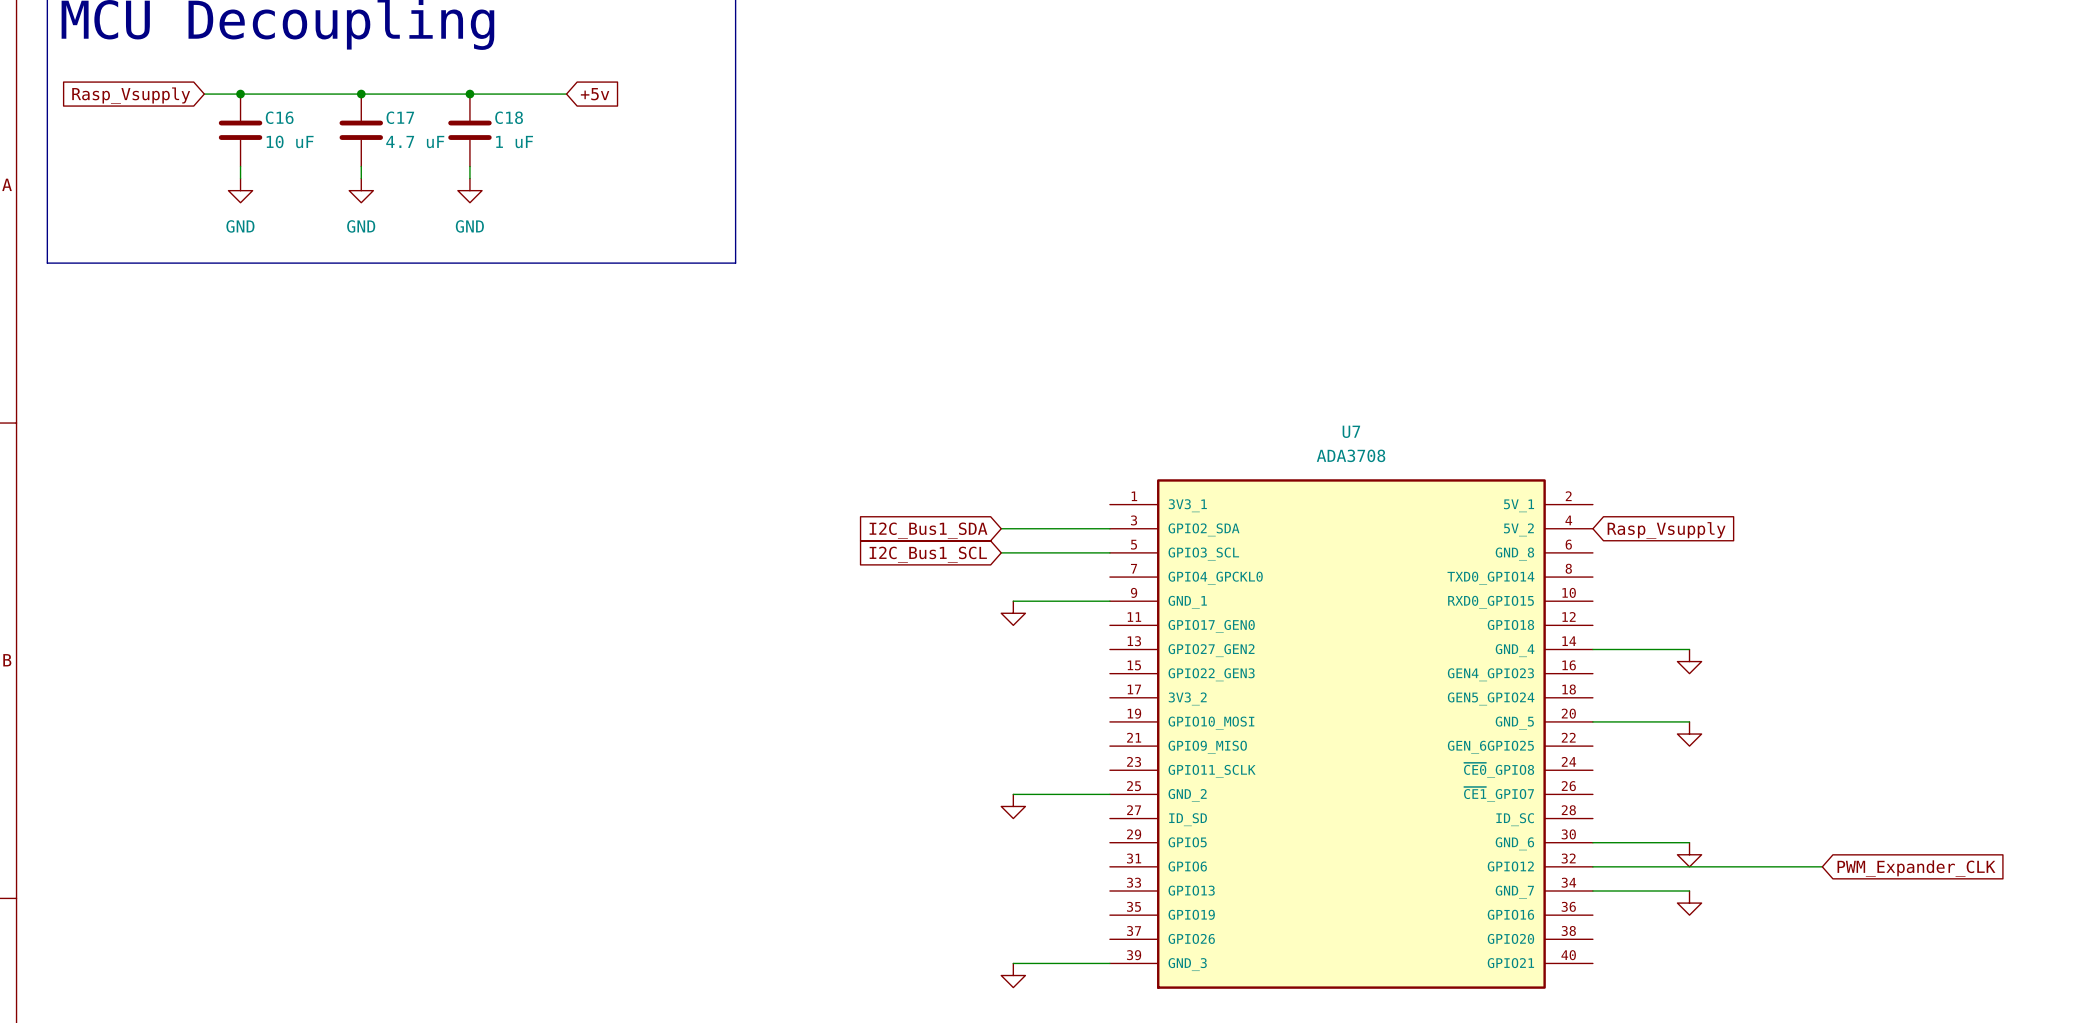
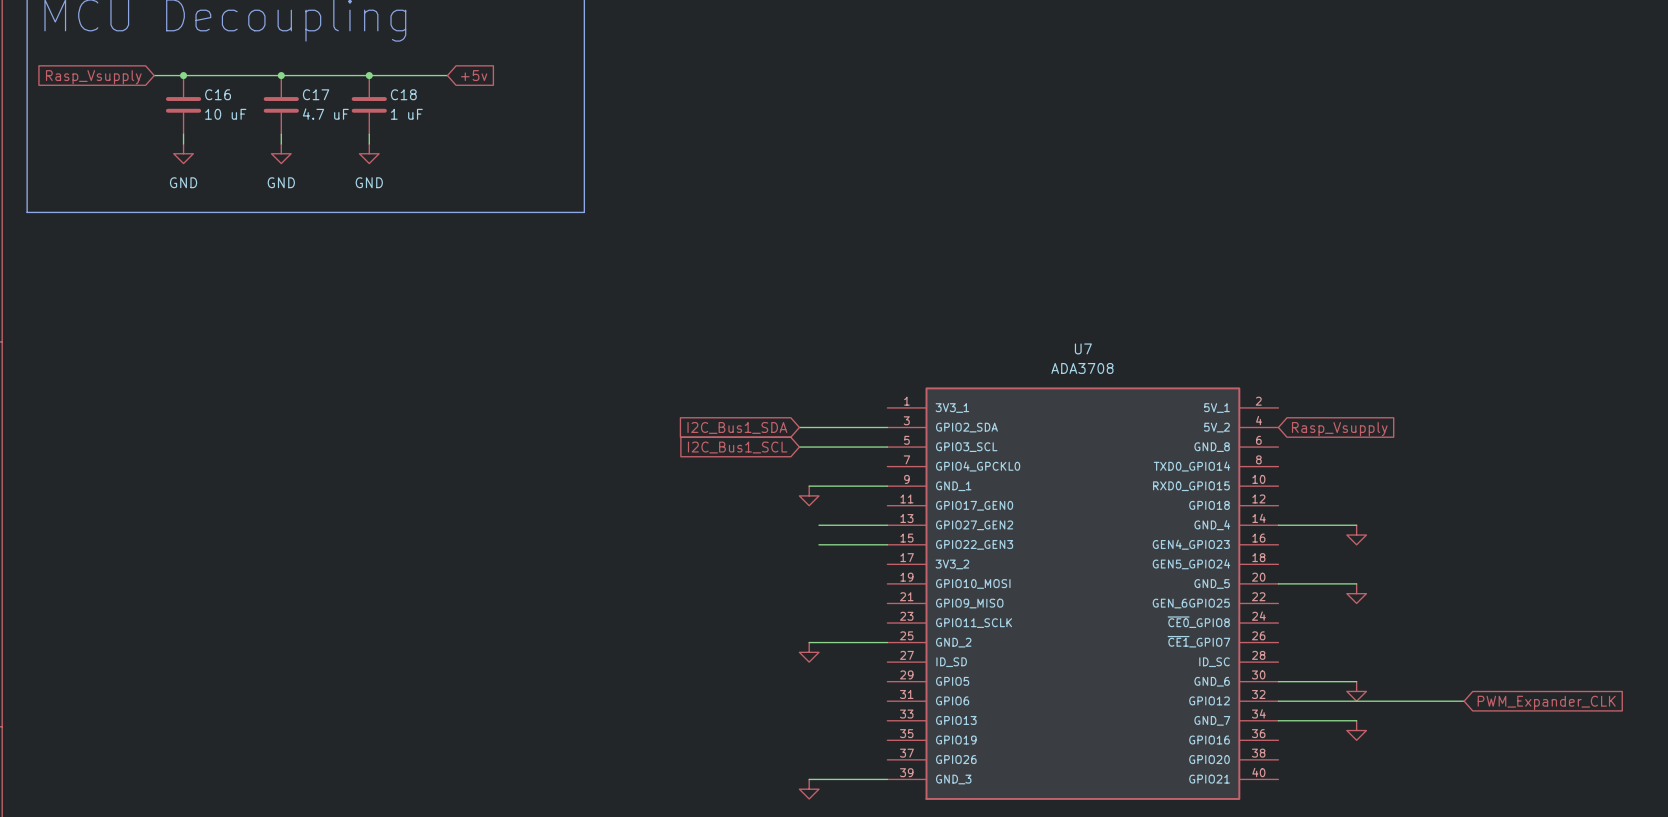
wire: none -> (818, 525) (887, 525)
wire: none -> (818, 544) (887, 544)

